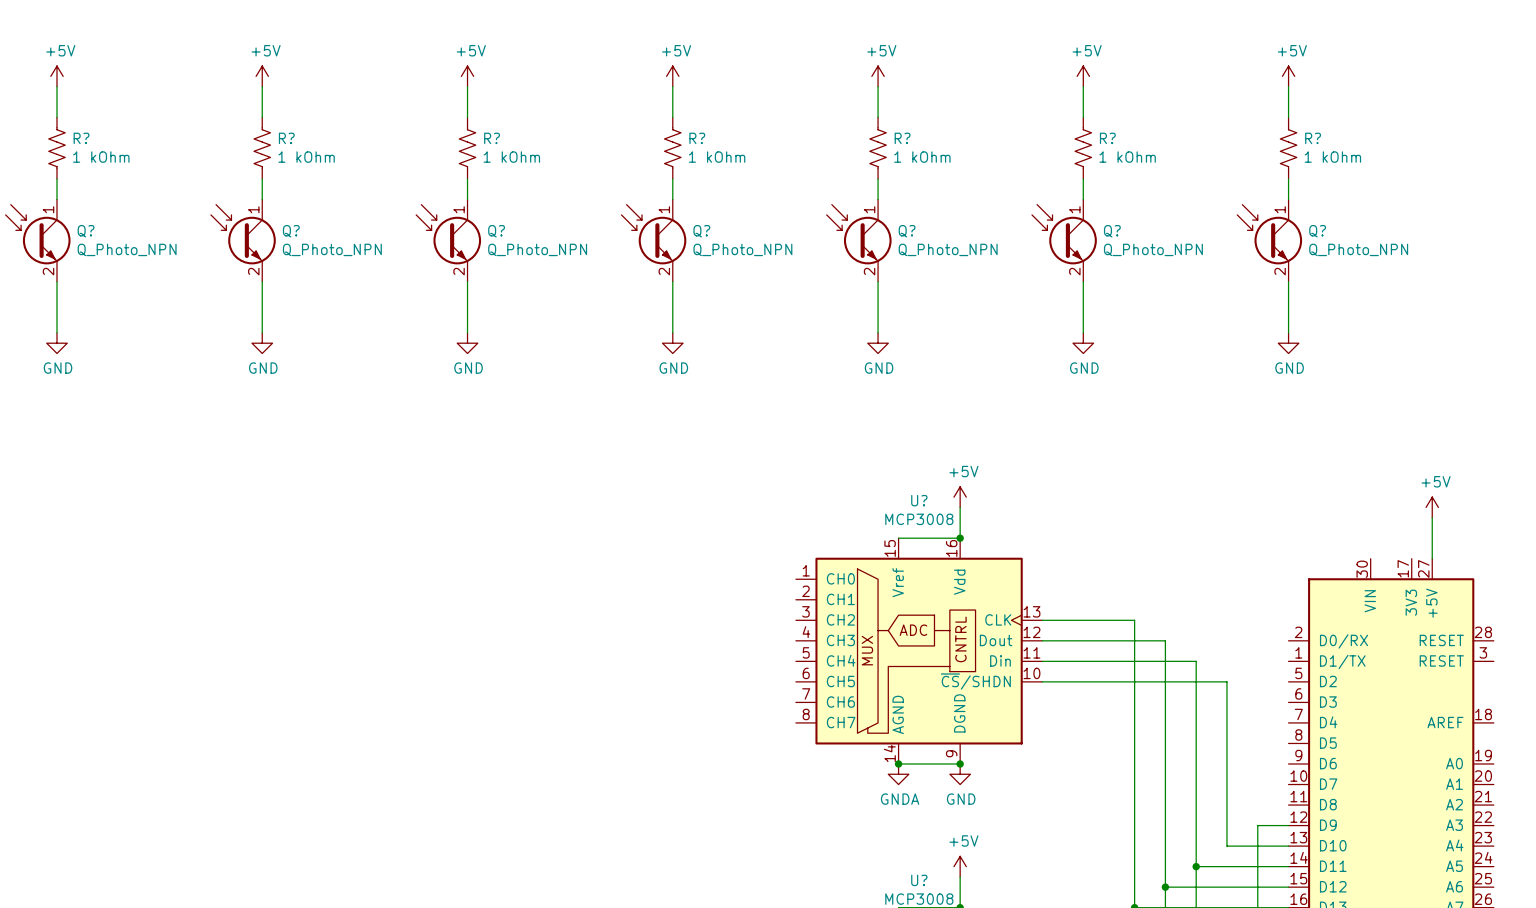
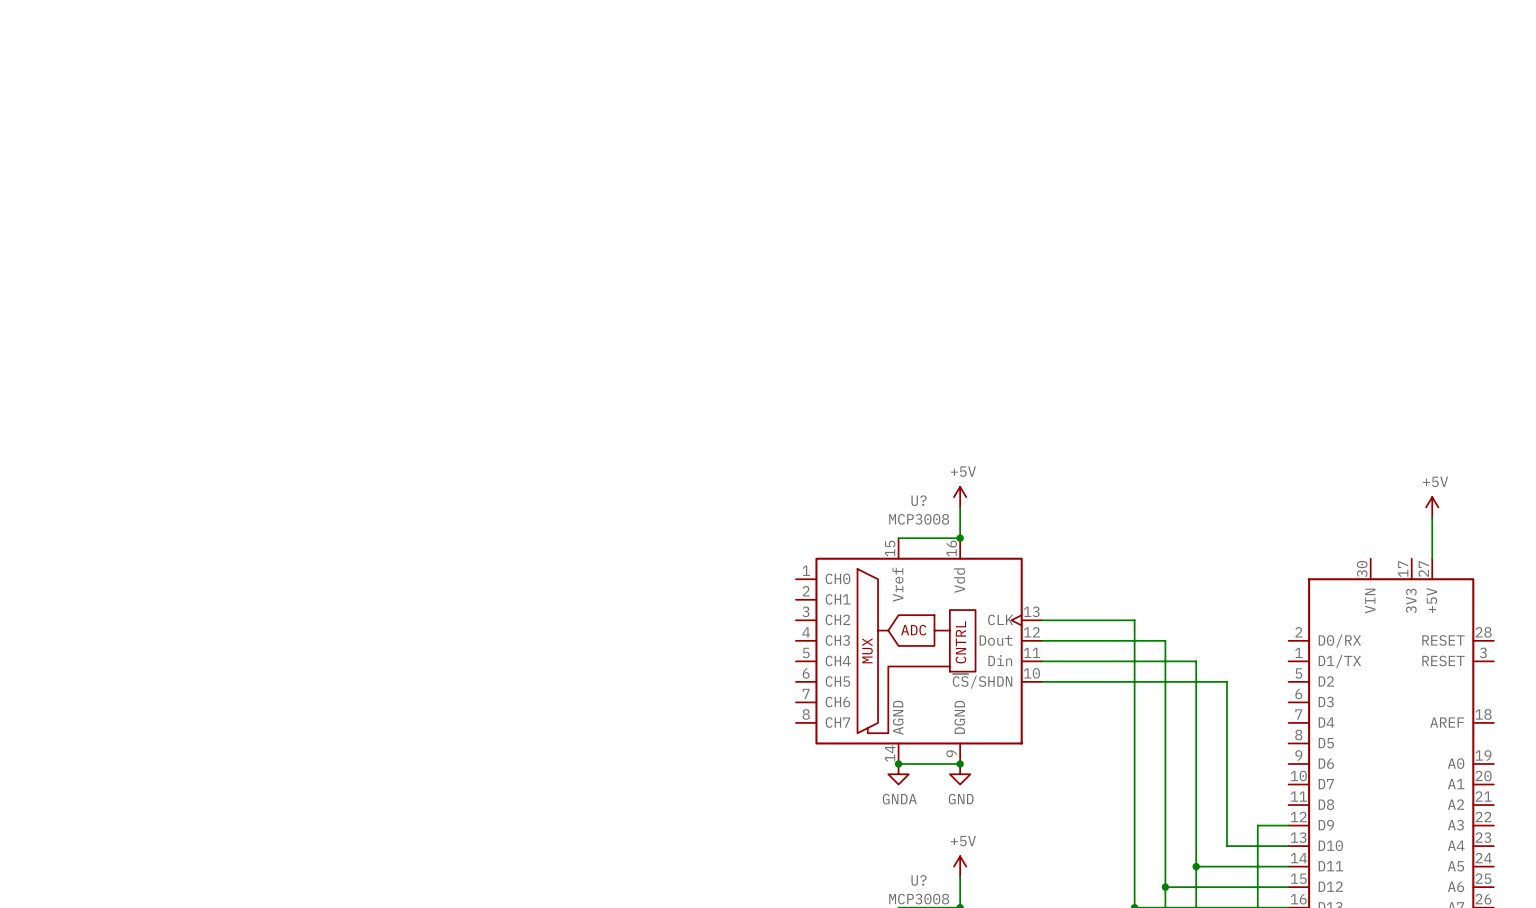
power symbol: +5V (56, 76) -> none
power symbol: +5V (262, 76) -> none
power symbol: +5V (467, 76) -> none
power symbol: +5V (672, 76) -> none
power symbol: +5V (878, 76) -> none
power symbol: +5V (1083, 76) -> none
power symbol: +5V (1288, 76) -> none
wire: (56, 86) (56, 117) -> none
wire: (262, 86) (262, 117) -> none
wire: (467, 86) (467, 117) -> none
wire: (672, 86) (672, 117) -> none
wire: (878, 86) (878, 117) -> none
wire: (1083, 86) (1083, 117) -> none
wire: (1288, 86) (1288, 117) -> none
R?: 1 kOhm (56, 148) -> none
R?: 1 kOhm (262, 148) -> none
R?: 1 kOhm (467, 148) -> none
R?: 1 kOhm (672, 148) -> none
R?: 1 kOhm (878, 148) -> none
R?: 1 kOhm (1083, 148) -> none
R?: 1 kOhm (1288, 148) -> none
wire: (56, 178) (56, 199) -> none
wire: (262, 178) (262, 199) -> none
wire: (467, 178) (467, 199) -> none
wire: (672, 178) (672, 199) -> none
wire: (878, 178) (878, 199) -> none
wire: (1083, 178) (1083, 199) -> none
wire: (1288, 178) (1288, 199) -> none
Q?: Q_Photo_NPN (38, 240) -> none
Q?: Q_Photo_NPN (243, 240) -> none
Q?: Q_Photo_NPN (448, 240) -> none
Q?: Q_Photo_NPN (653, 240) -> none
Q?: Q_Photo_NPN (859, 240) -> none
Q?: Q_Photo_NPN (1064, 240) -> none
Q?: Q_Photo_NPN (1269, 240) -> none
wire: (56, 281) (56, 332) -> none
wire: (262, 281) (262, 332) -> none
wire: (467, 281) (467, 332) -> none
wire: (672, 281) (672, 332) -> none
wire: (878, 281) (878, 332) -> none
wire: (1083, 281) (1083, 332) -> none
wire: (1288, 281) (1288, 332) -> none
power symbol: GND (56, 343) -> none
power symbol: GND (262, 343) -> none
power symbol: GND (467, 343) -> none
power symbol: GND (672, 343) -> none
power symbol: GND (878, 343) -> none
power symbol: GND (1083, 343) -> none
power symbol: GND (1288, 343) -> none

